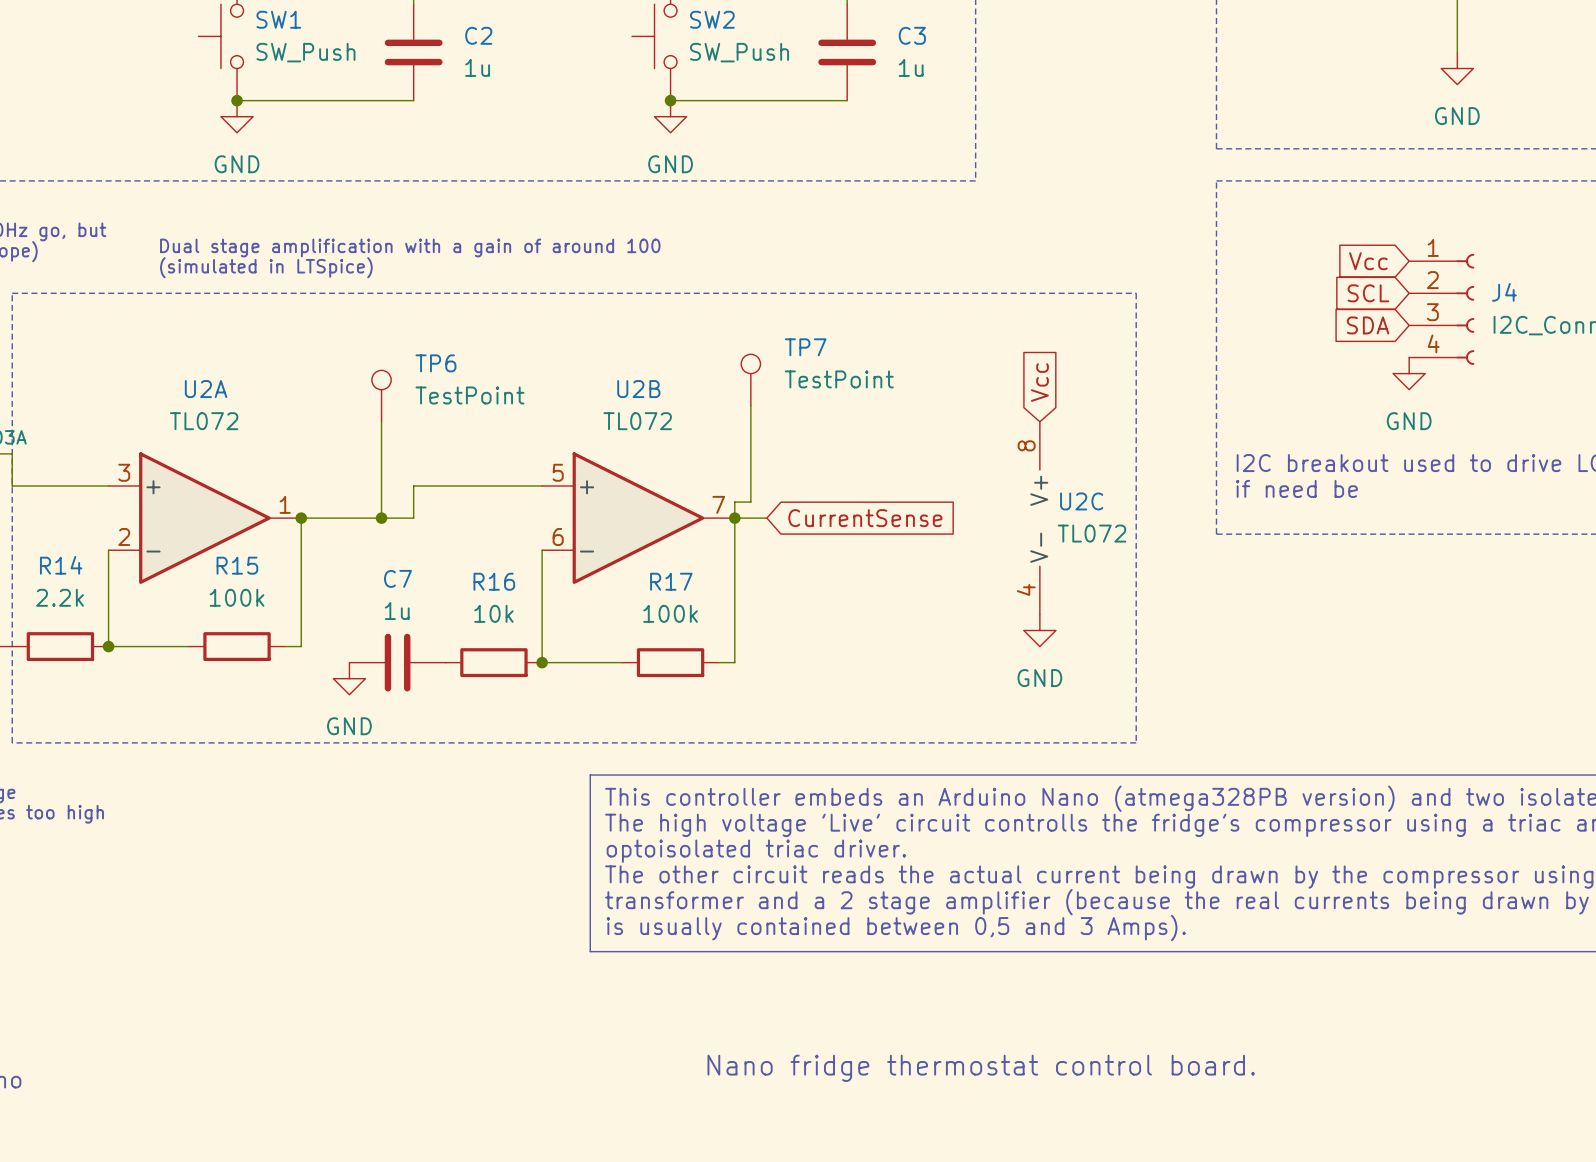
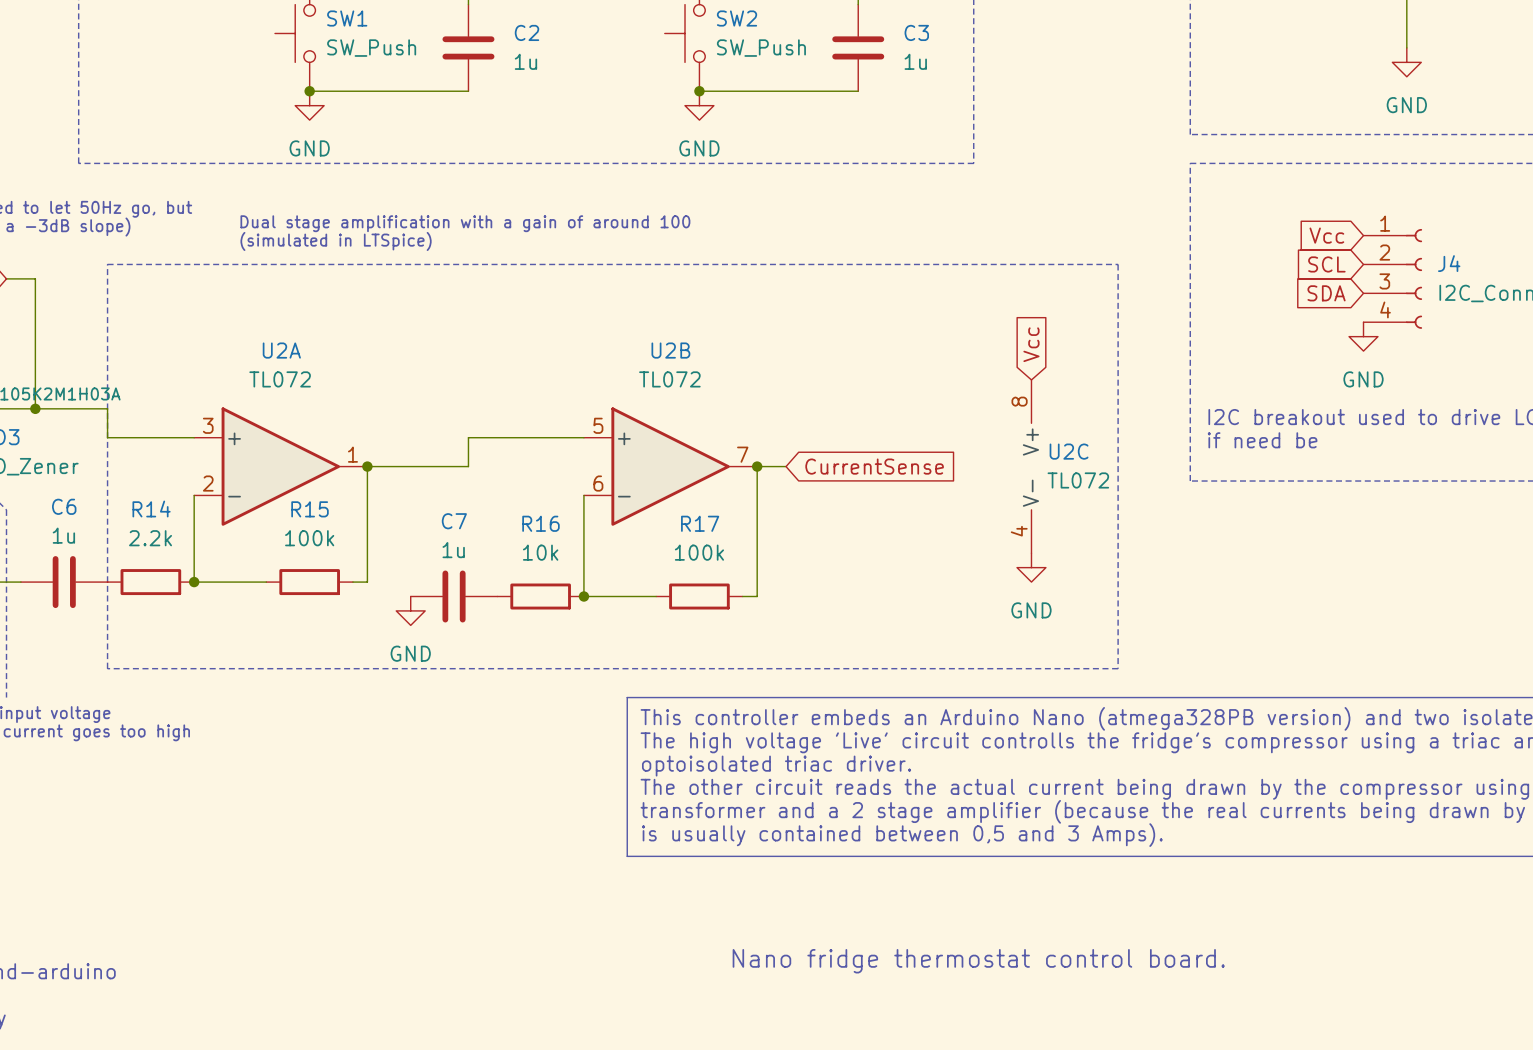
TP7: TestPoint (750, 380) -> none
TP6: TestPoint (381, 396) -> none
wire: (750, 405) (750, 502) (734, 502) (734, 518) -> none
wire: (381, 421) (381, 518) -> none
junction: (381, 518) -> none

